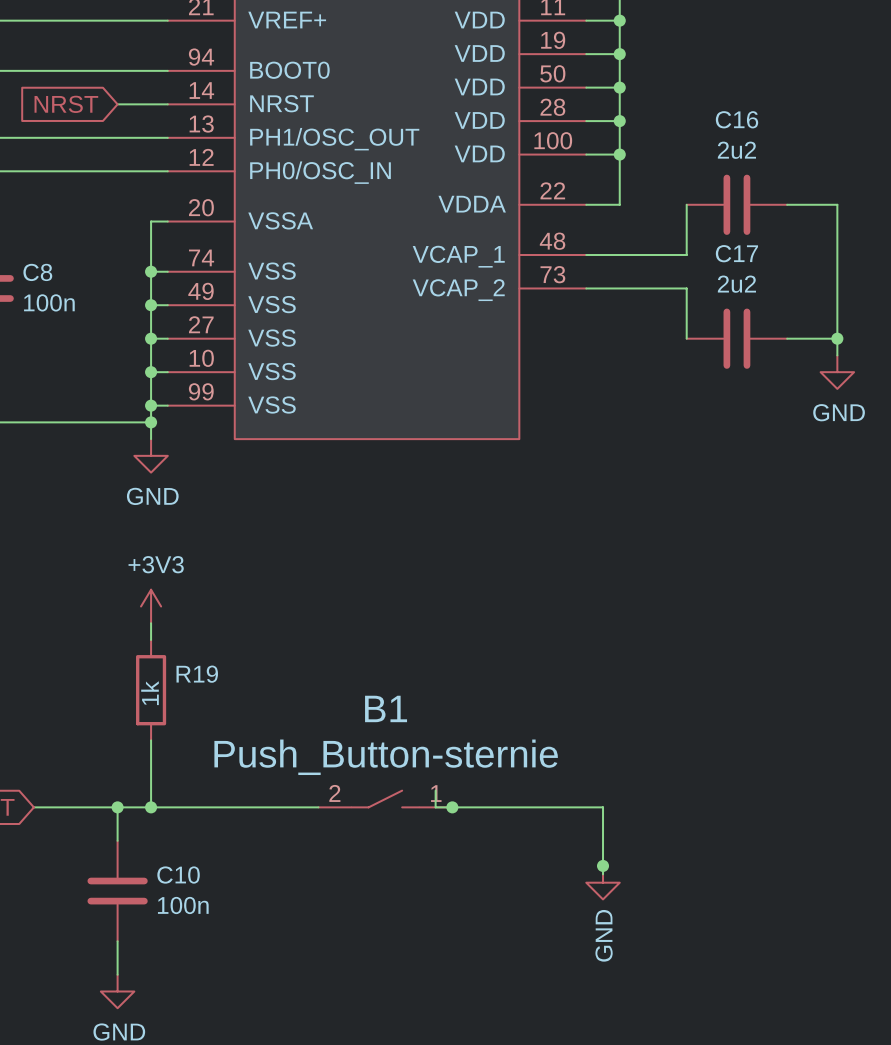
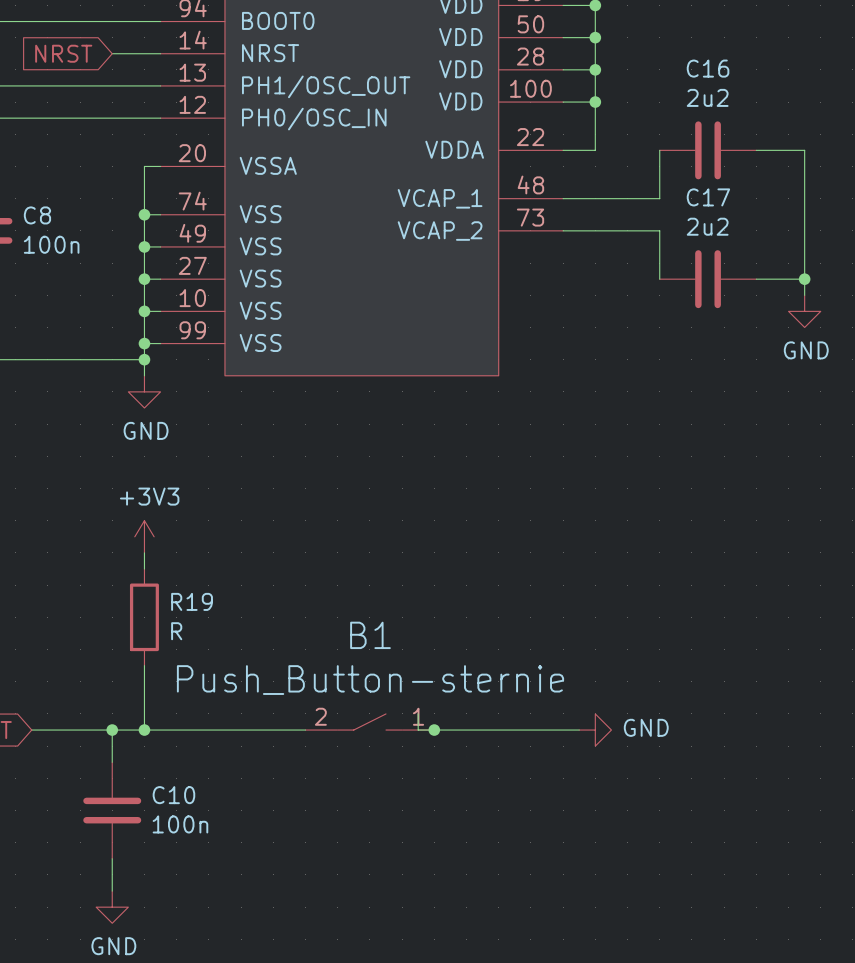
R19 value: 1k (150, 693) -> R (176, 631)
wire: (603, 807) (603, 874) -> none
junction: (603, 865) -> none
power symbol rotation: 0° (603, 882) -> 90° counterclockwise (595, 730)
power symbol position: GND (603, 882) -> GND (595, 730)

